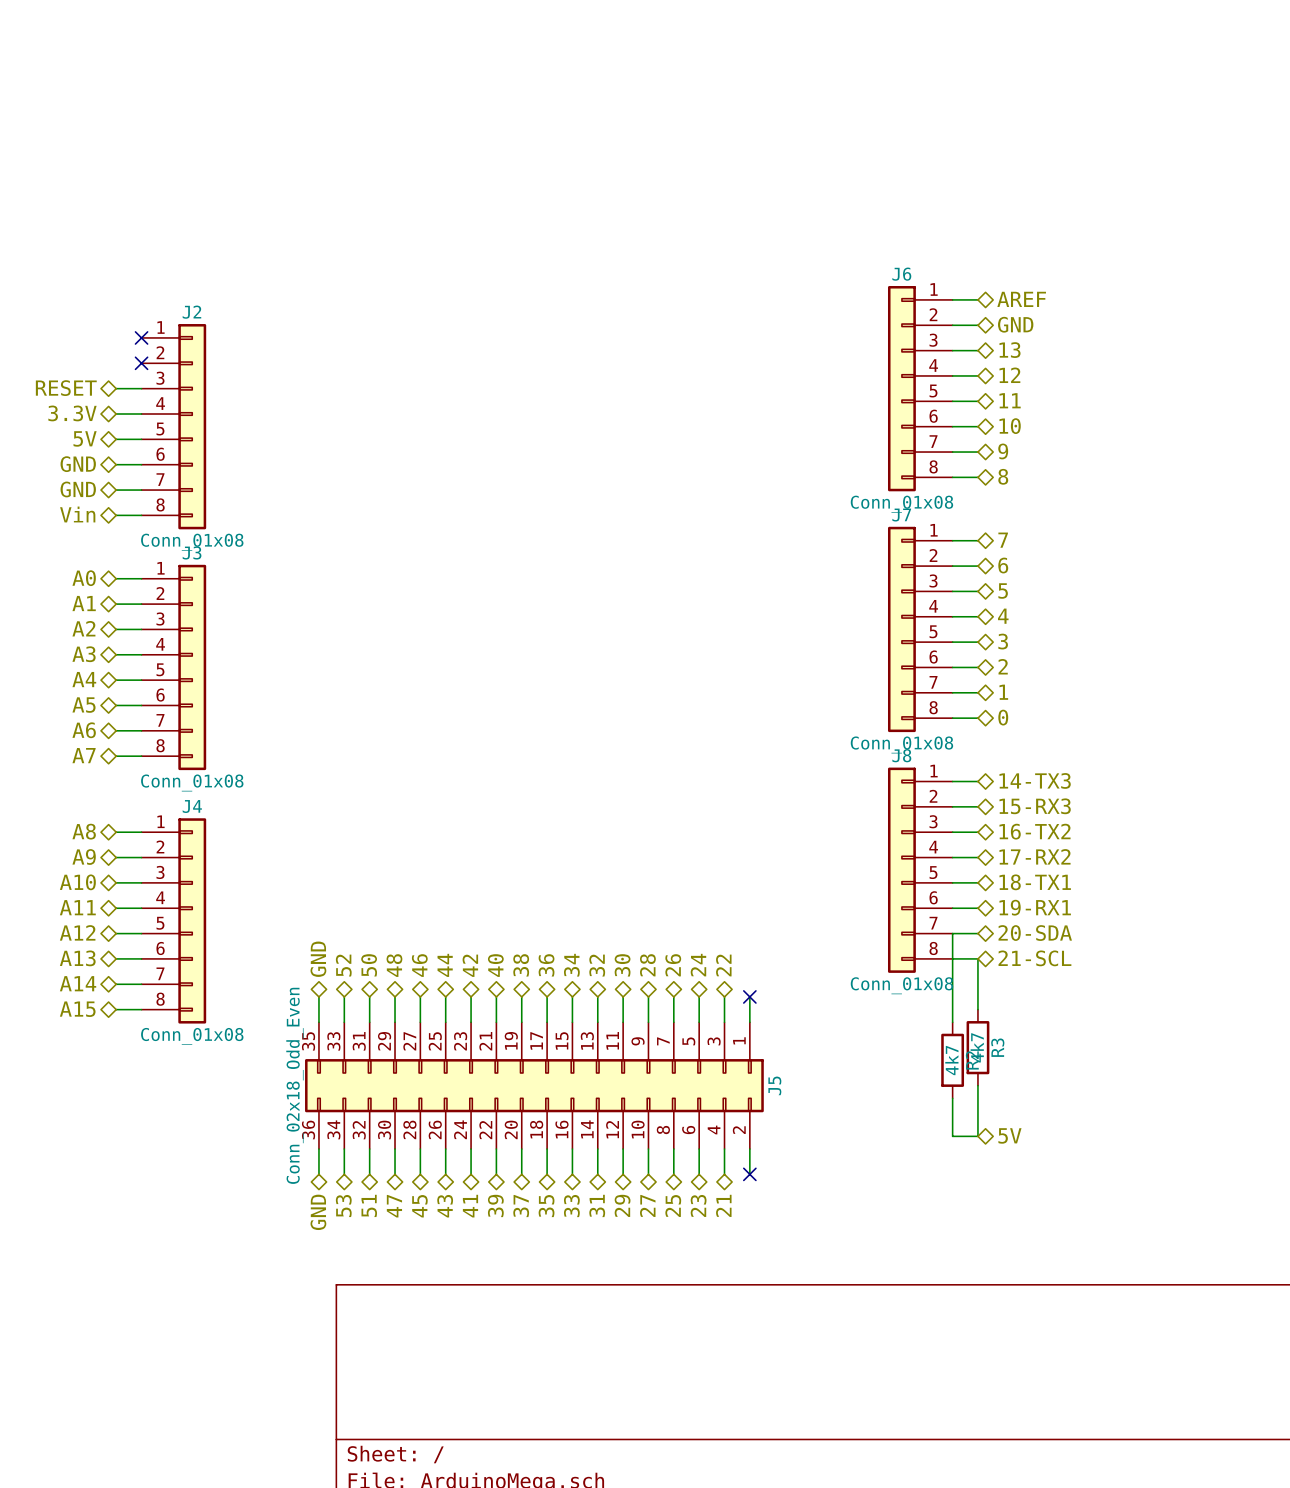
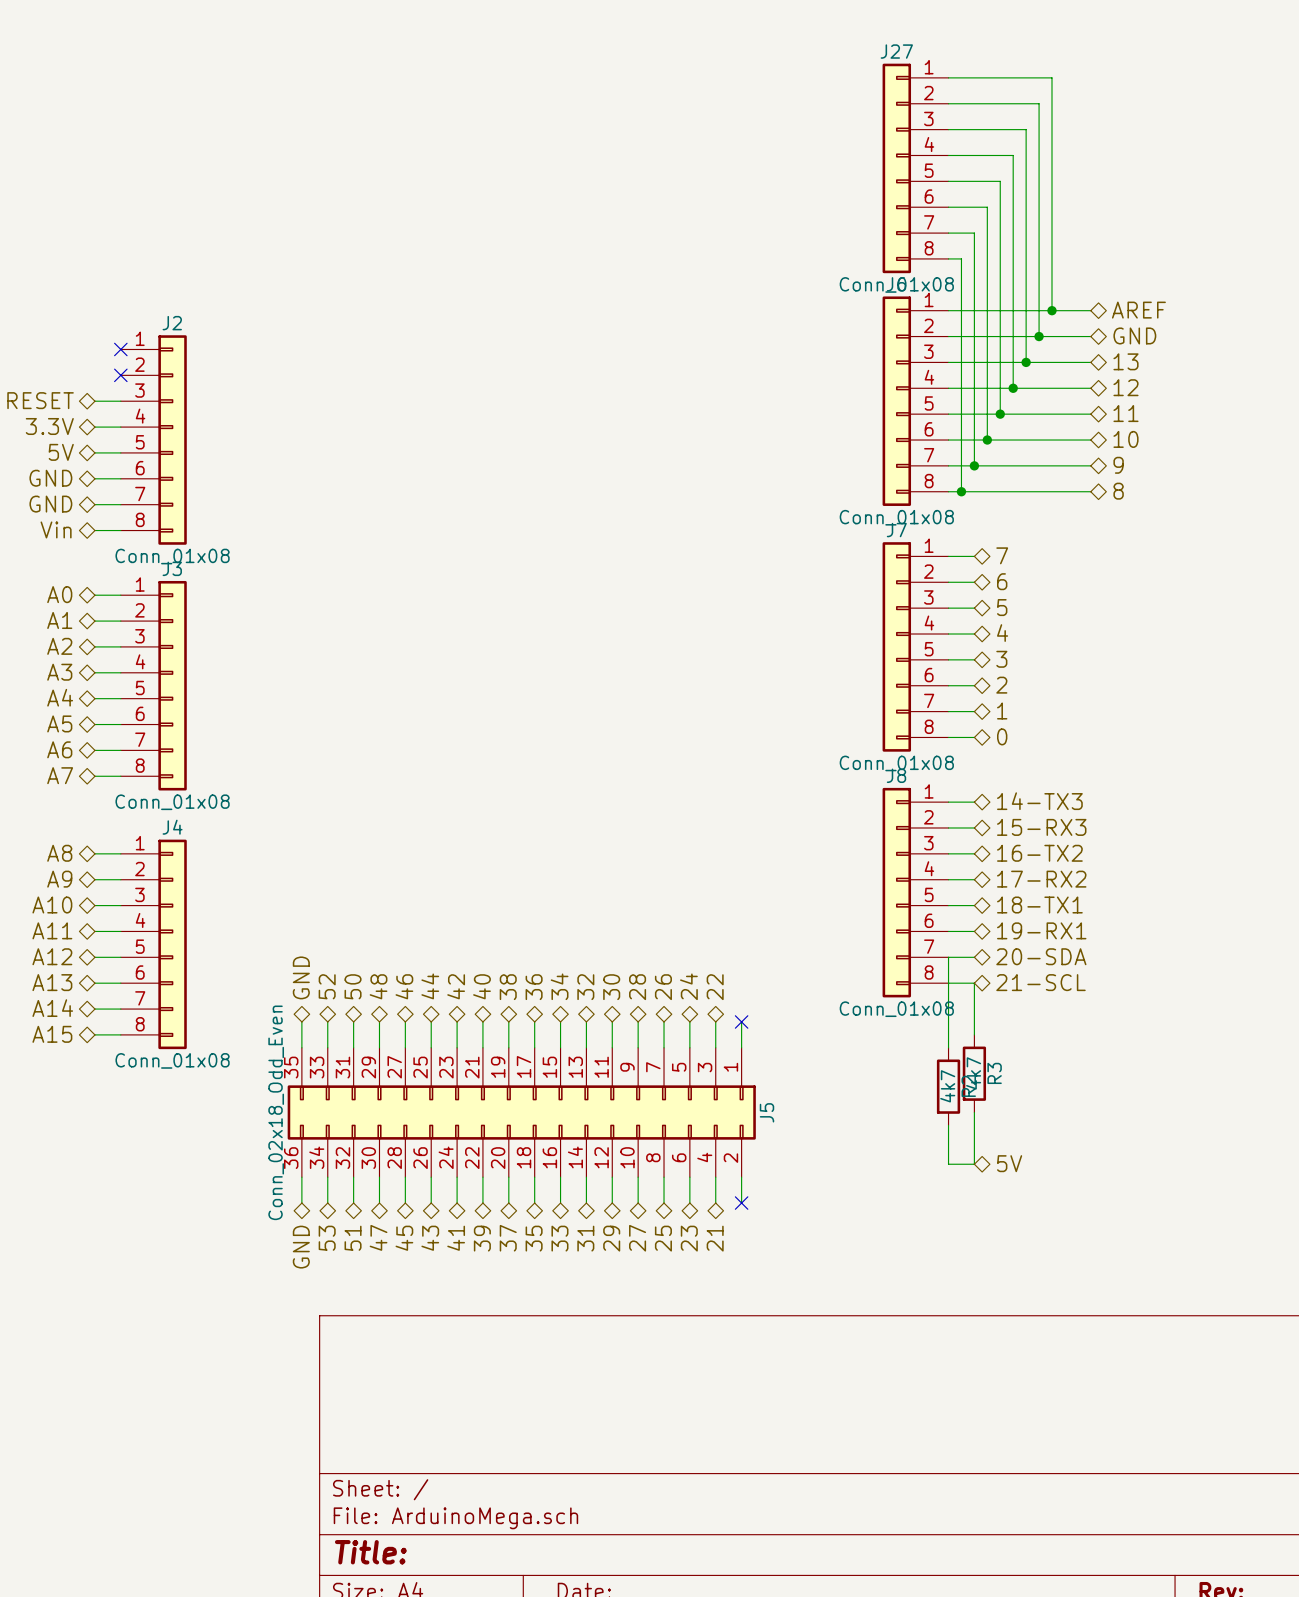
wire: none -> (948, 77) (1051, 77) (1051, 310)
wire: none -> (948, 103) (1039, 103) (1039, 336)
wire: none -> (948, 129) (1026, 129) (1026, 362)
wire: none -> (948, 155) (1013, 155) (1013, 388)
J27: none -> Conn_01x08 (915, 168)
wire: none -> (948, 181) (1000, 181) (1000, 414)
wire: none -> (948, 207) (987, 207) (987, 440)
wire: none -> (948, 233) (974, 233) (974, 465) (1090, 465)
wire: none -> (948, 258) (961, 258) (961, 491)
wire: none -> (974, 310) (1090, 310)
hierarchical label position: AREF (1021, 299) -> AREF (1138, 310)
junction: none -> (1051, 310)
hierarchical label position: GND (1015, 324) -> GND (1134, 335)
wire: none -> (974, 336) (1090, 336)
junction: none -> (1039, 336)
wire: none -> (974, 362) (1090, 362)
hierarchical label position: 13 (1010, 350) -> 13 (1125, 361)
junction: none -> (1026, 362)
wire: none -> (974, 388) (1090, 388)
hierarchical label position: 12 (1009, 375) -> 12 (1125, 387)
junction: none -> (1013, 388)
hierarchical label position: 11 (1010, 400) -> 11 (1125, 413)
wire: none -> (974, 414) (1090, 414)
junction: none -> (1000, 414)
wire: none -> (974, 440) (1090, 440)
junction: none -> (987, 440)
hierarchical label position: 10 (1010, 426) -> 10 (1125, 439)
hierarchical label position: 9 (1003, 451) -> 9 (1118, 465)
junction: none -> (974, 465)
hierarchical label position: 8 (1003, 476) -> 8 (1118, 491)
junction: none -> (961, 491)
wire: none -> (974, 491) (1090, 491)

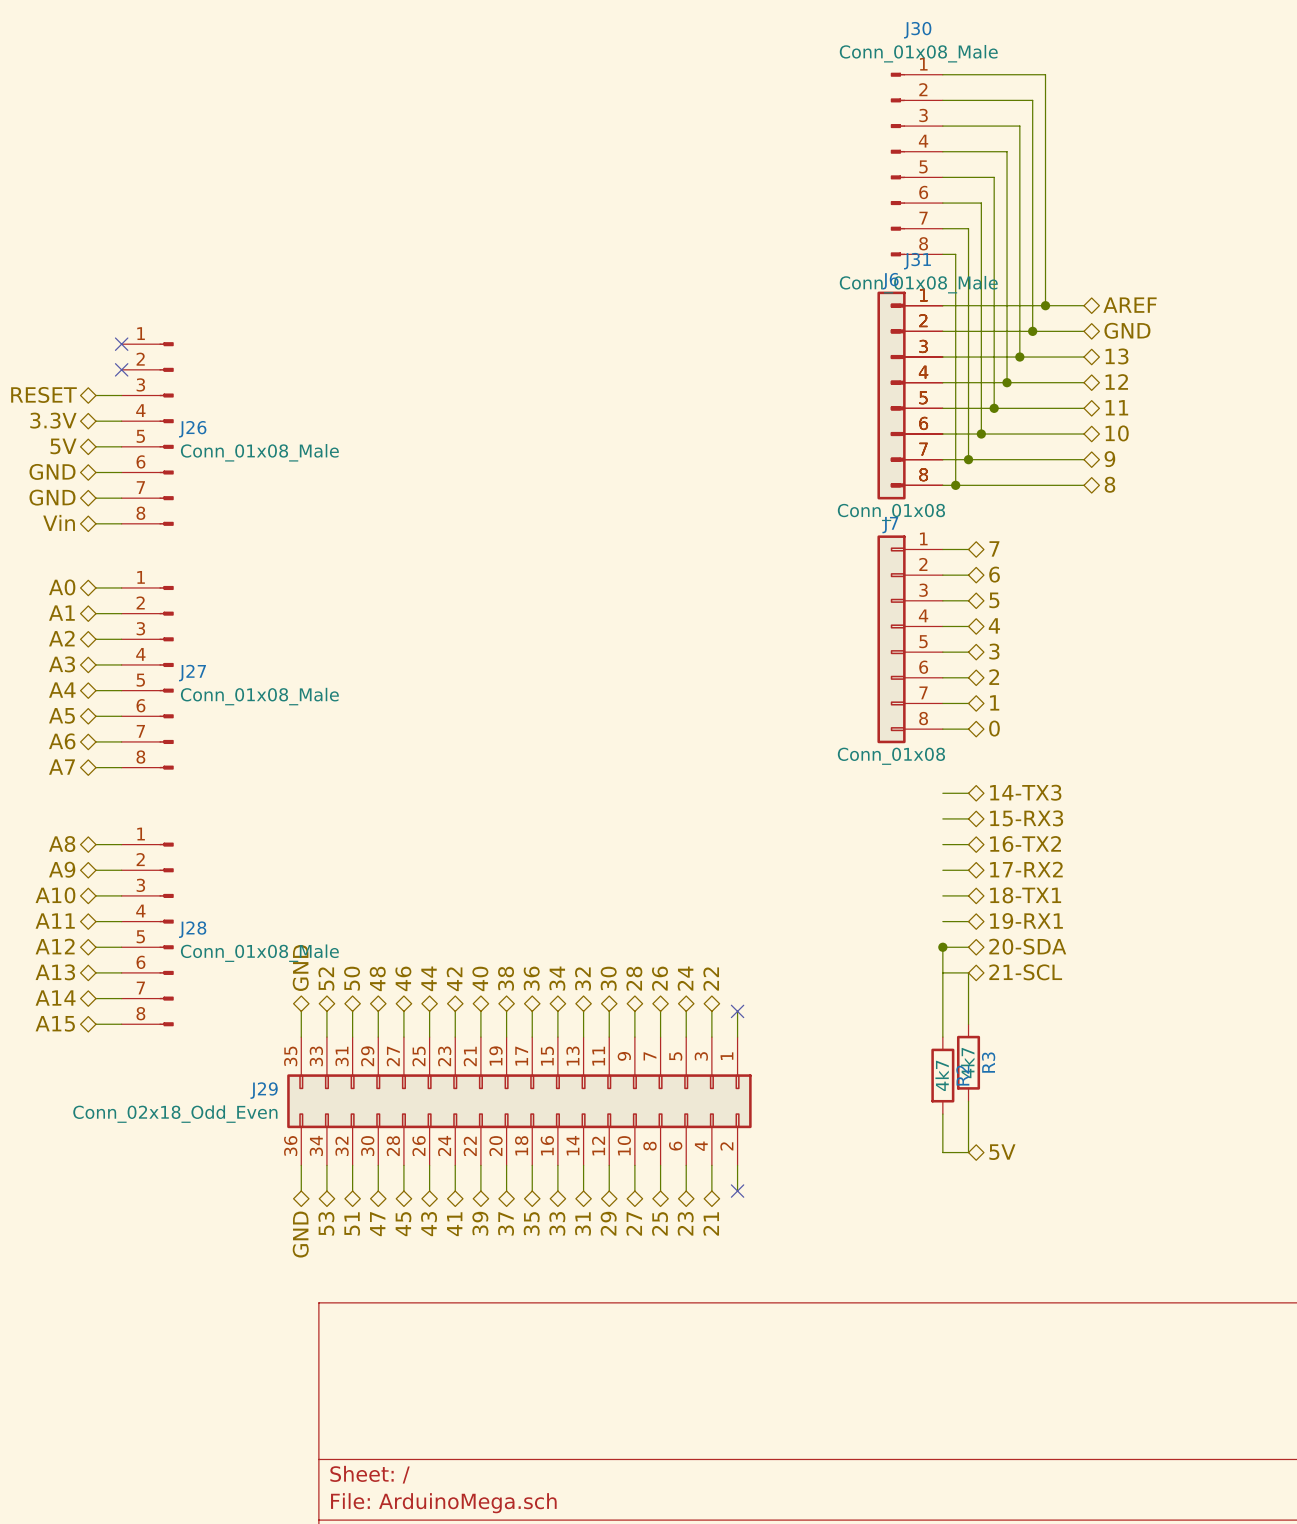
J27 name position: J27 (896, 51) -> J27 (192, 673)
J27 symbol: [882, 63, 949, 274] -> [121, 585, 174, 770]
J30: none -> Conn_01x08_Male (916, 164)
J27 value: Conn_01x08 (896, 284) -> Conn_01x08_Male (259, 696)
J31: none -> Conn_01x08_Male (916, 395)
J26: none -> Conn_01x08_Male (147, 434)
J2: Conn_01x08 (153, 440) -> none
J3: Conn_01x08 (153, 685) -> none
J8: Conn_01x08 (915, 892) -> none
J28: none -> Conn_01x08_Male (147, 934)
J4: Conn_01x08 (153, 944) -> none
junction: none -> (942, 947)
J5 value rotation: 0° (276, 1112) -> 90° clockwise (175, 1114)
J5 name: J5 (766, 1112) -> J29 (264, 1090)

